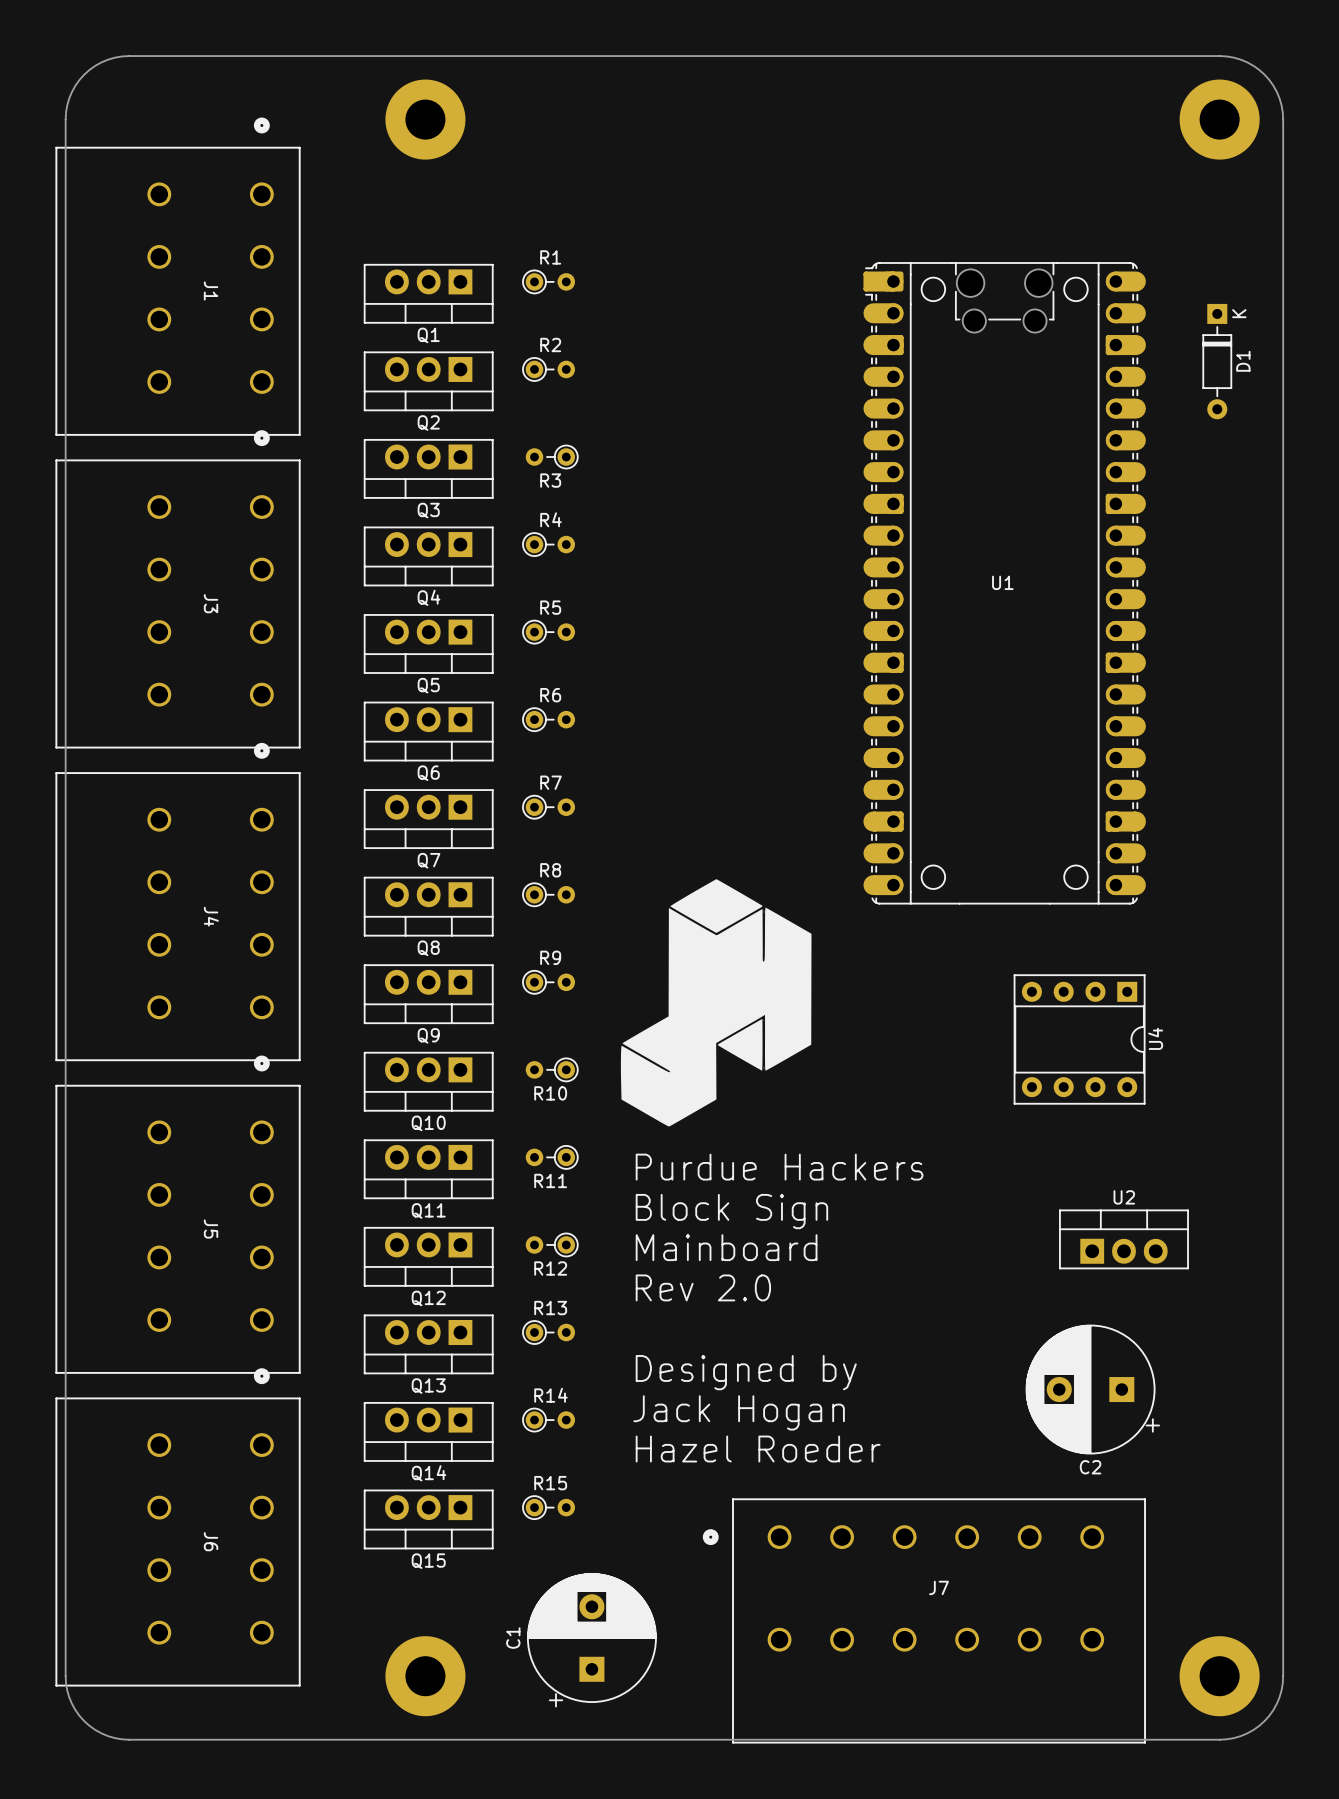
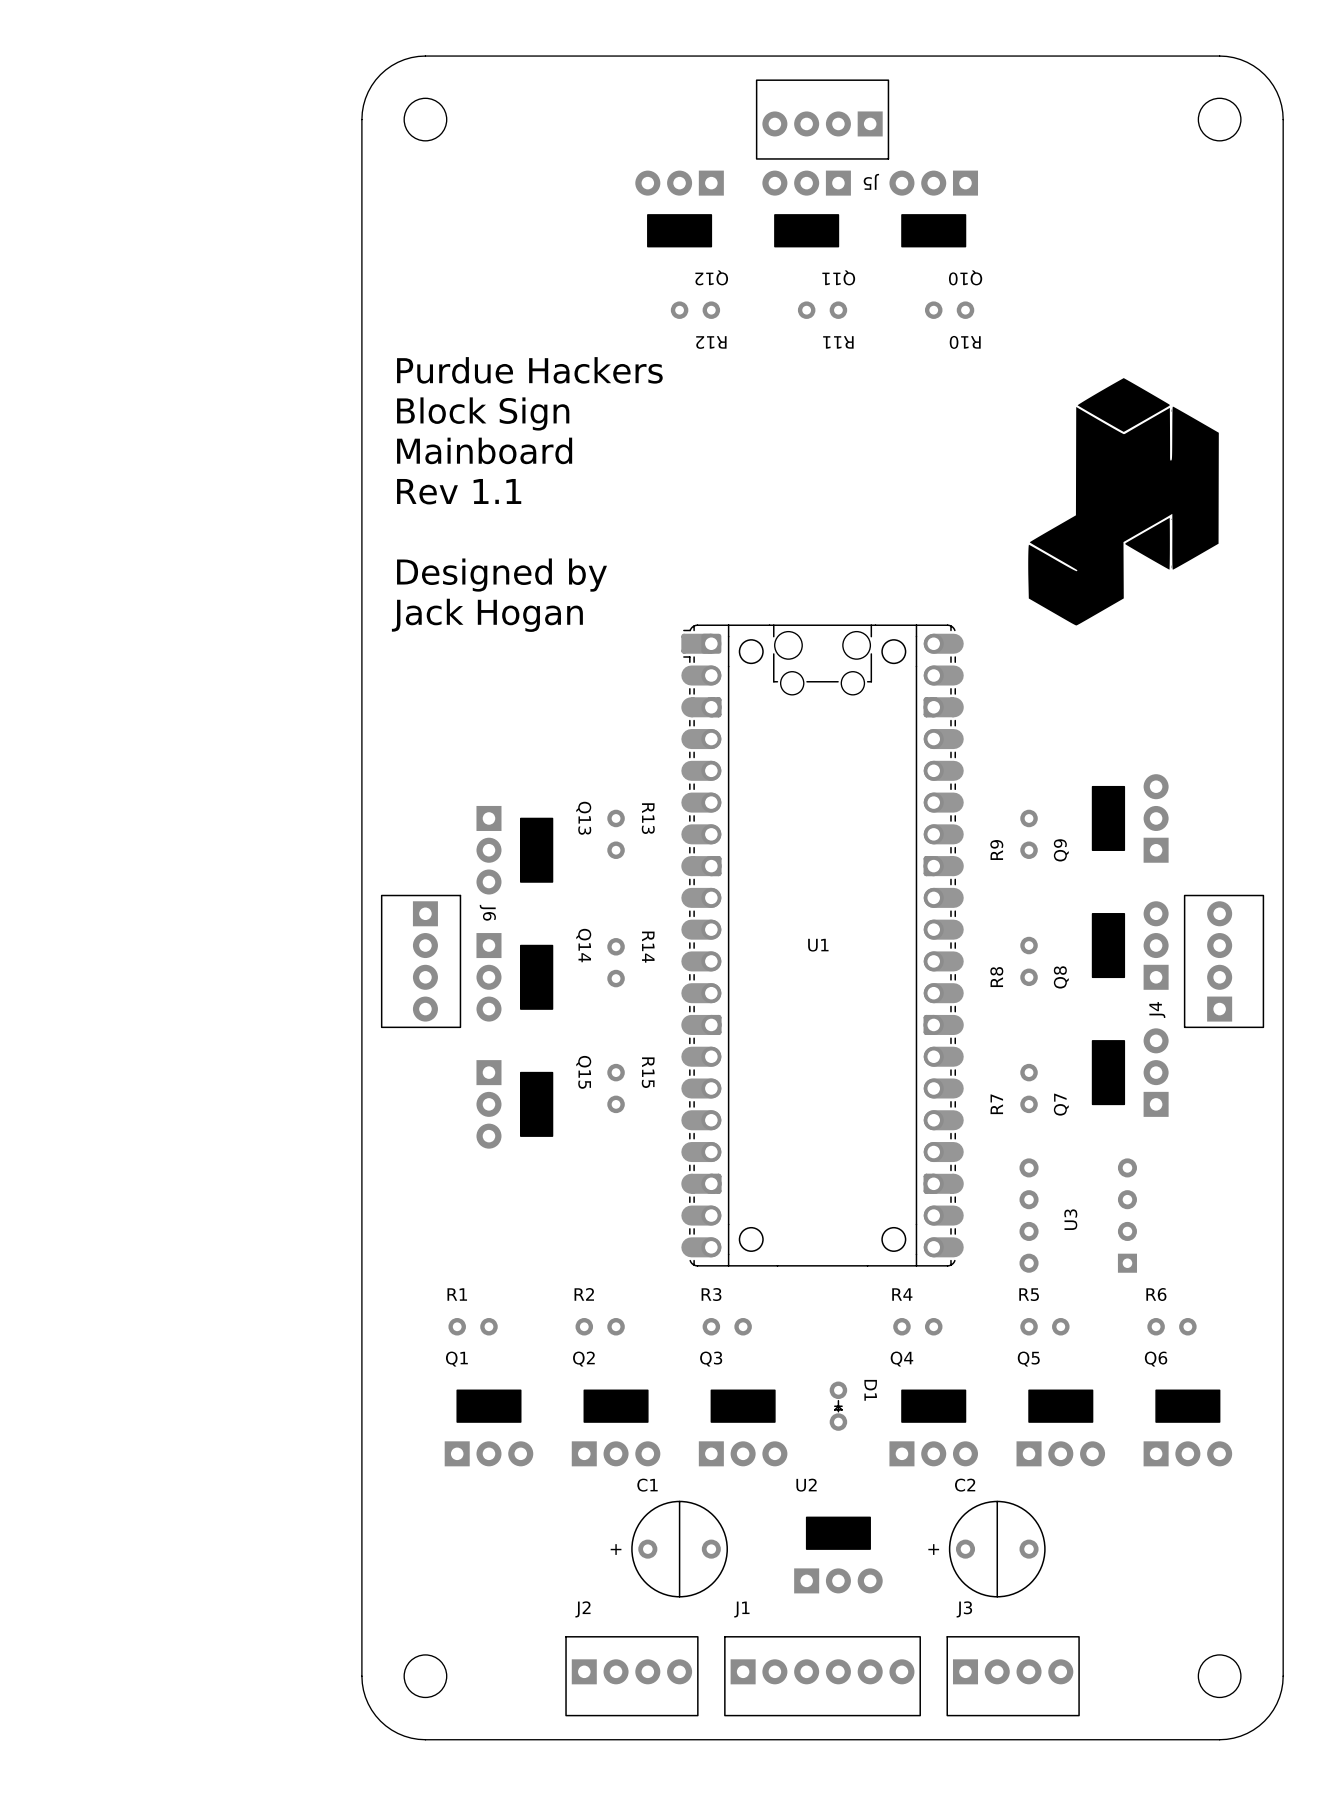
board edge: (425, 56) (129, 56) (115, 57) (95, 65) (79, 79) (69, 98) (65, 119) (65, 1676) (67, 1690) (75, 1710) (89, 1725) (108, 1736) (122, 1739) (425, 1739) -> (425, 56) (411, 57) (397, 62) (380, 74) (368, 92) (363, 105) (361, 119) (361, 1676) (363, 1690) (368, 1703) (380, 1721) (397, 1733) (411, 1738) (425, 1739)
round board edge: none -> [403, 97, 448, 142]
round board edge: none -> [1197, 97, 1242, 142]
J1 footprint: [55, 117, 301, 436] -> [724, 1636, 921, 1717]
part: (425, 119) -> none
part: (1219, 119) -> none
U1 footprint: [863, 262, 1146, 905] -> [681, 624, 964, 1267]
Q1 footprint: [363, 264, 494, 324] -> [444, 1389, 534, 1467]
R1 footprint: [522, 269, 576, 295] -> [448, 1318, 498, 1336]
J1 name position: J1 (211, 291) -> J1 (741, 1609)
D1 footprint: [1202, 303, 1233, 420] -> [829, 1381, 848, 1431]
Q1 name position: Q1 (428, 335) -> Q1 (456, 1359)
Q2 footprint: [363, 351, 494, 412] -> [571, 1389, 661, 1467]
R2 footprint: [522, 357, 576, 382] -> [575, 1318, 625, 1336]
text: none -> Purdue Hackers (529, 370)
drawing: none -> [1028, 378, 1219, 626]
text: none -> Block Sign (483, 413)
Q2 name position: Q2 (428, 423) -> Q2 (583, 1359)
J3 footprint: [55, 430, 301, 749] -> [946, 1636, 1080, 1717]
Q3 footprint: [363, 439, 494, 499] -> [698, 1389, 788, 1467]
R3 footprint: [525, 444, 579, 470] -> [702, 1318, 752, 1336]
text: none -> Mainboard (484, 450)
R3 name position: R3 (550, 480) -> R3 (711, 1294)
text: none -> Rev 1.1 (459, 491)
Q3 name position: Q3 (428, 510) -> Q3 (711, 1359)
Q4 footprint: [363, 526, 494, 587] -> [889, 1389, 979, 1467]
R4 footprint: [522, 532, 576, 557] -> [893, 1318, 943, 1336]
text: none -> Designed by (502, 575)
Q4 name position: Q4 (428, 597) -> Q4 (901, 1359)
J3 name position: J3 (211, 603) -> J3 (964, 1609)
Q5 footprint: [363, 614, 494, 674] -> [1016, 1389, 1106, 1467]
text: none -> Jack Hogan (487, 615)
R5 footprint: [522, 619, 576, 645] -> [1020, 1318, 1070, 1336]
Q5 name position: Q5 (428, 685) -> Q5 (1028, 1359)
Q6 footprint: [363, 701, 494, 762] -> [1143, 1389, 1233, 1467]
R6 footprint: [522, 707, 576, 732] -> [1147, 1318, 1197, 1336]
J4 footprint: [55, 742, 301, 1062] -> [1183, 894, 1265, 1029]
Q6 name position: Q6 (428, 773) -> Q6 (1156, 1359)
R7 name position: R7 (550, 782) -> R7 (996, 1104)
Q7 footprint: [363, 789, 494, 849] -> [1091, 1028, 1169, 1117]
R7 footprint: [522, 794, 576, 820] -> [1020, 1063, 1038, 1114]
Q7 name position: Q7 (428, 860) -> Q7 (1061, 1104)
R8 name position: R8 (550, 870) -> R8 (996, 977)
Q8 footprint: [363, 876, 494, 937] -> [1091, 901, 1169, 990]
drawing: [620, 879, 812, 1127] -> none
R8 footprint: [522, 882, 576, 908] -> [1020, 936, 1038, 987]
J4 name position: J4 (211, 916) -> J4 (1157, 1010)
Q8 name position: Q8 (428, 948) -> Q8 (1061, 977)
R9 name position: R9 (550, 957) -> R9 (996, 850)
Q9 footprint: [363, 964, 494, 1024] -> [1091, 774, 1169, 863]
R9 footprint: [522, 970, 576, 995] -> [1020, 809, 1038, 859]
Q9 name position: Q9 (428, 1035) -> Q9 (1061, 850)
U4: (1079, 1039) -> none
Q10 footprint: [363, 1051, 494, 1112] -> [889, 170, 979, 248]
J5 footprint: [55, 1055, 301, 1374] -> [755, 79, 890, 160]
R10 footprint: [525, 1057, 579, 1083] -> [924, 301, 975, 319]
Q10 name position: Q10 (428, 1123) -> Q10 (965, 277)
Q11 footprint: [363, 1139, 494, 1200] -> [762, 170, 851, 248]
R11 footprint: [525, 1145, 579, 1170] -> [797, 301, 848, 319]
text: Purdue Hackers (779, 1167) -> none
U2 name position: U2 (1124, 1197) -> U2 (806, 1485)
U2 footprint: [1059, 1209, 1189, 1270] -> [794, 1516, 883, 1594]
Q11 name position: Q11 (428, 1210) -> Q11 (838, 277)
text: Block Sign (731, 1211) -> none
U3: none -> (1078, 1215)
Q12 footprint: [363, 1227, 494, 1287] -> [635, 170, 724, 248]
J5 name position: J5 (211, 1229) -> J5 (871, 181)
R12 footprint: [525, 1232, 579, 1258] -> [670, 301, 721, 319]
text: Mainboard (726, 1247) -> none
text: Rev 2.0 (703, 1287) -> none
Q12 name position: Q12 (428, 1298) -> Q12 (711, 277)
R13 name position: R13 (550, 1308) -> R13 (648, 818)
Q13 footprint: [363, 1314, 494, 1375] -> [476, 805, 554, 895]
R13 footprint: [522, 1320, 576, 1345] -> [607, 809, 625, 859]
C2 footprint: [1025, 1324, 1160, 1455] -> [948, 1500, 1046, 1598]
J6 footprint: [55, 1368, 301, 1687] -> [380, 894, 462, 1029]
text: Designed by (746, 1372) -> none
Q13 name position: Q13 (428, 1386) -> Q13 (583, 818)
R14 name position: R14 (550, 1395) -> R14 (648, 947)
Q14 footprint: [363, 1402, 494, 1462] -> [476, 933, 554, 1022]
R14 footprint: [522, 1407, 576, 1433] -> [607, 938, 625, 988]
text: Jack Hogan (739, 1412) -> none
text: Hazel Roeder (758, 1449) -> none
C2 name position: C2 (1090, 1467) -> C2 (965, 1485)
Q14 name position: Q14 (428, 1473) -> Q14 (583, 945)
R15 name position: R15 (550, 1483) -> R15 (648, 1072)
Q15 footprint: [363, 1489, 494, 1550] -> [476, 1060, 554, 1149]
R15 footprint: [522, 1495, 576, 1520] -> [607, 1063, 625, 1114]
J6 name position: J6 (211, 1541) -> J6 (487, 912)
Q15 name position: Q15 (428, 1561) -> Q15 (583, 1072)
C1 footprint: [527, 1573, 657, 1708] -> [631, 1500, 728, 1598]
J7: (924, 1620) -> none
C1 name position: C1 (513, 1638) -> C1 (647, 1485)
round board edge: none -> [403, 1654, 448, 1699]
round board edge: none -> [1197, 1654, 1242, 1699]
part: (425, 1676) -> none
J2: none -> (631, 1676)
part: (1219, 1676) -> none

